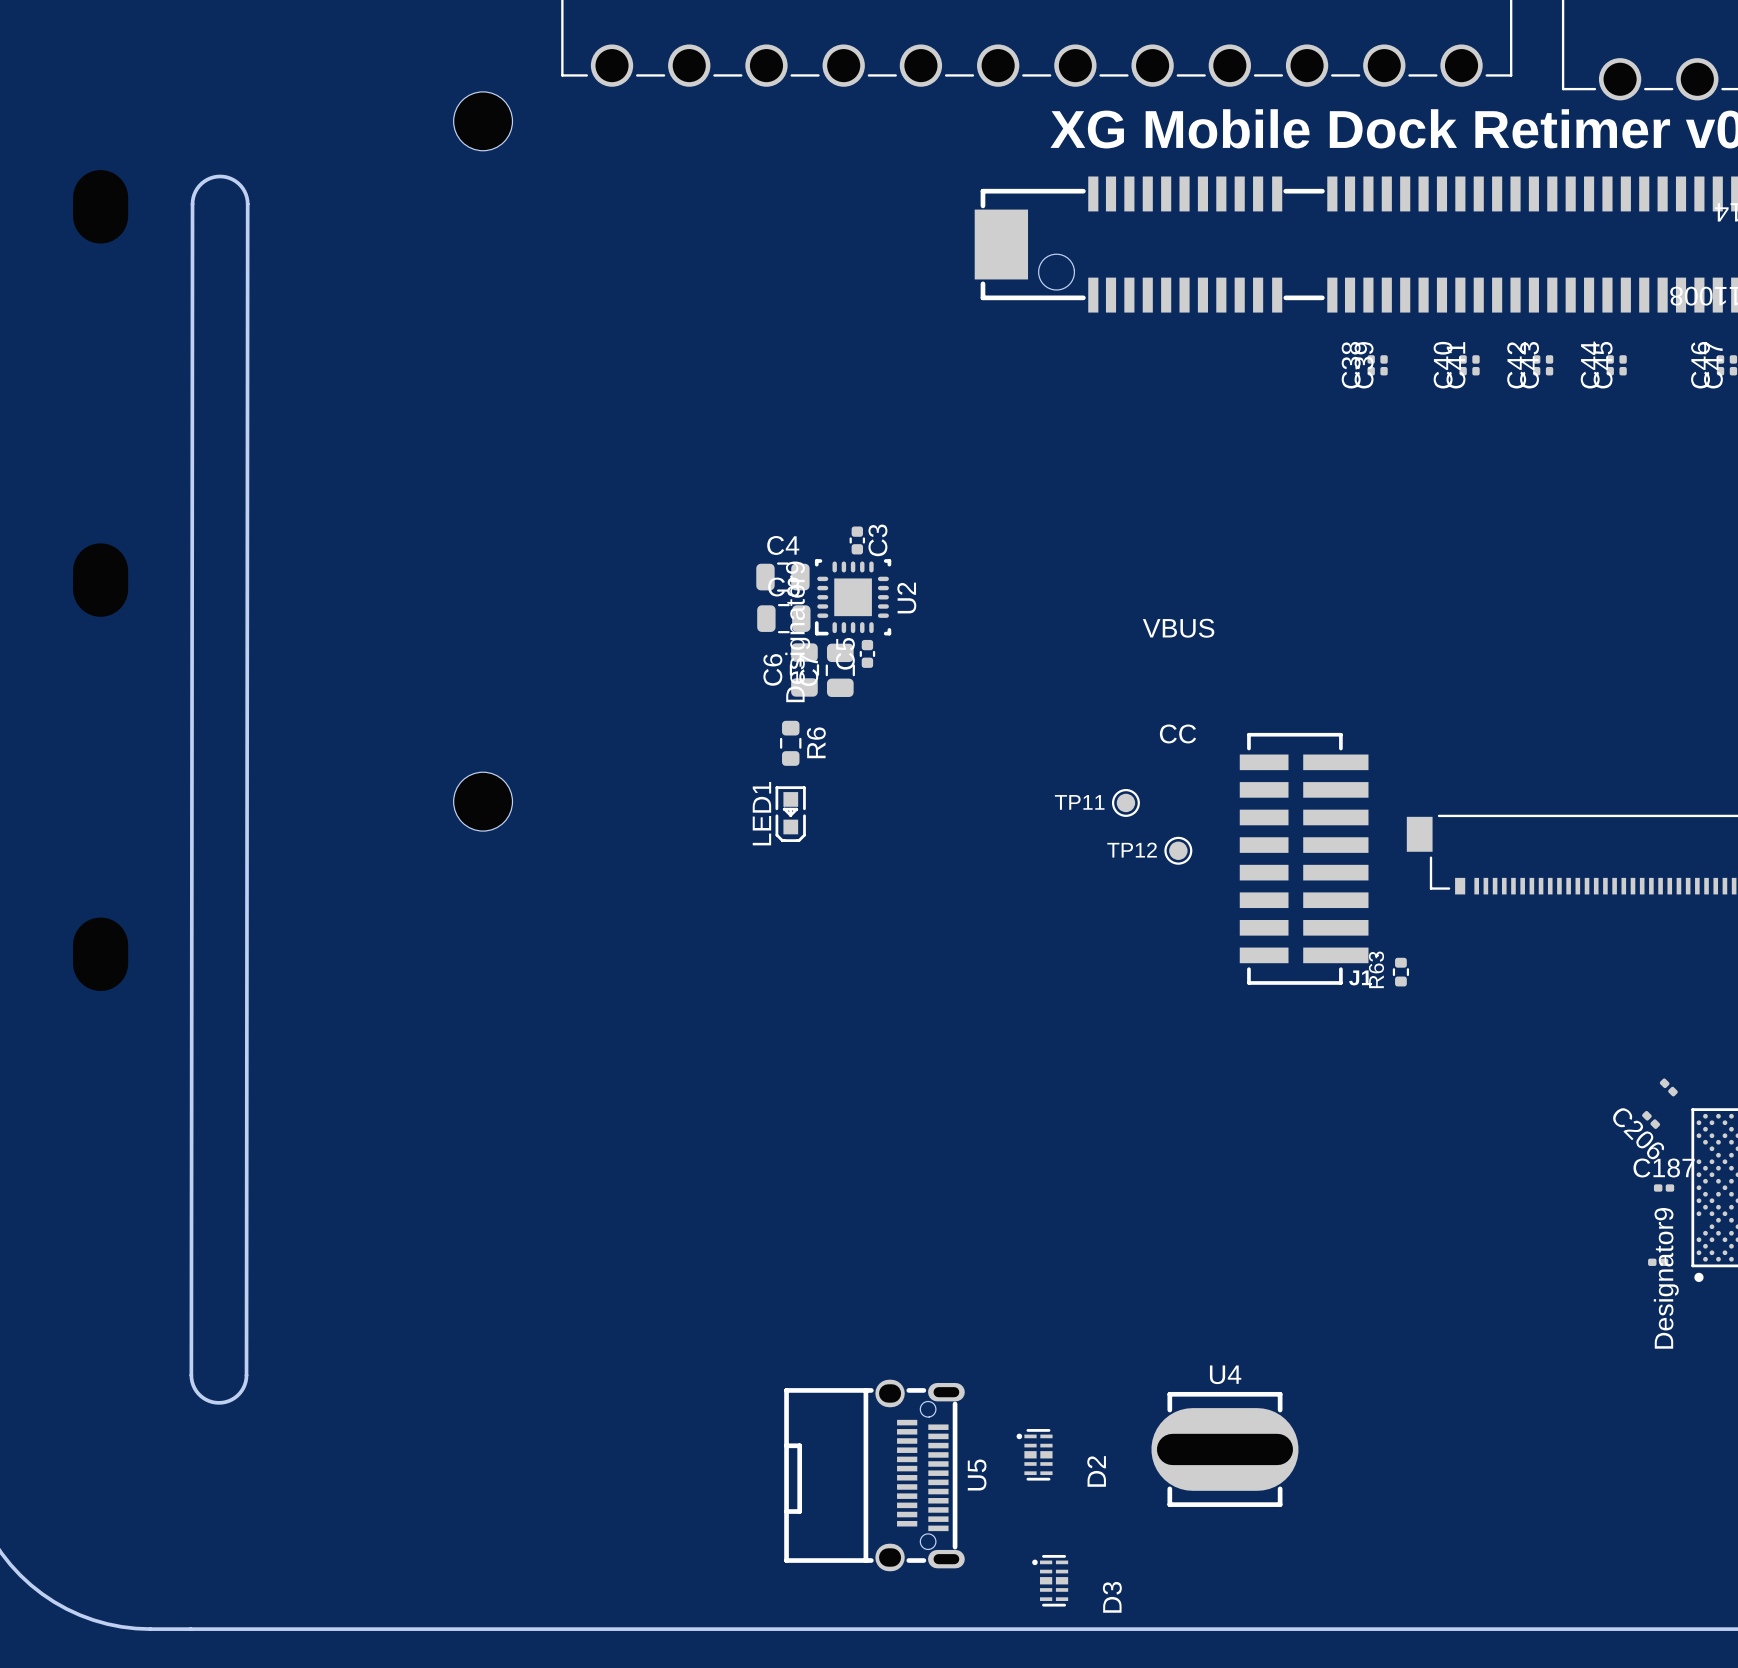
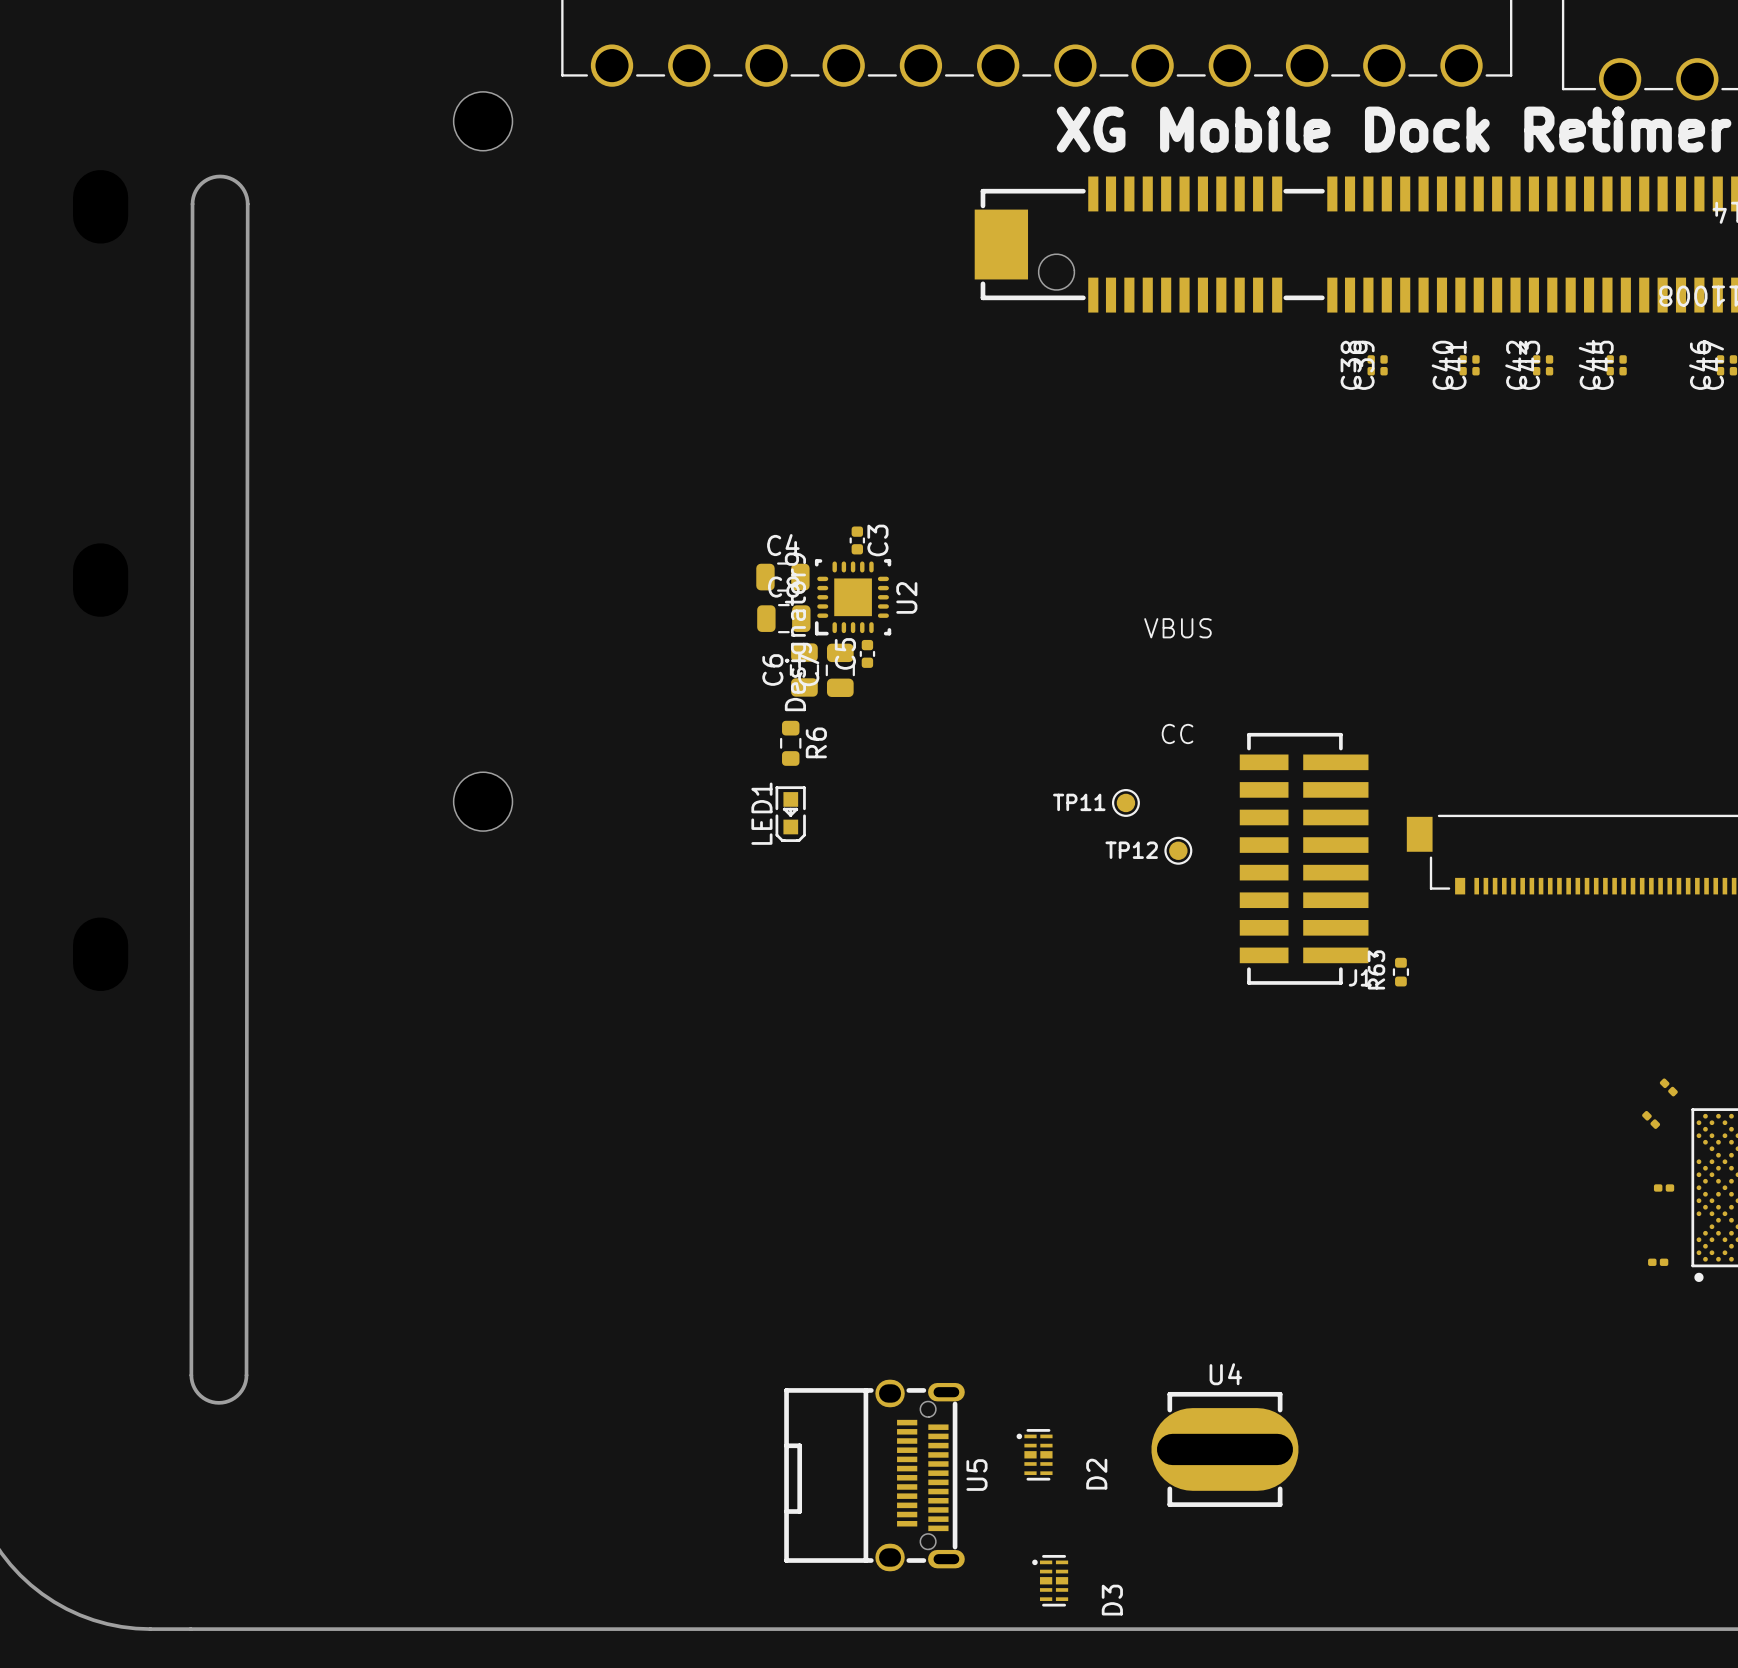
C206 name: C206 (1639, 1133) -> none
C187 name: C187 (1664, 1167) -> none
part text: Designator9 (1666, 1278) -> none

